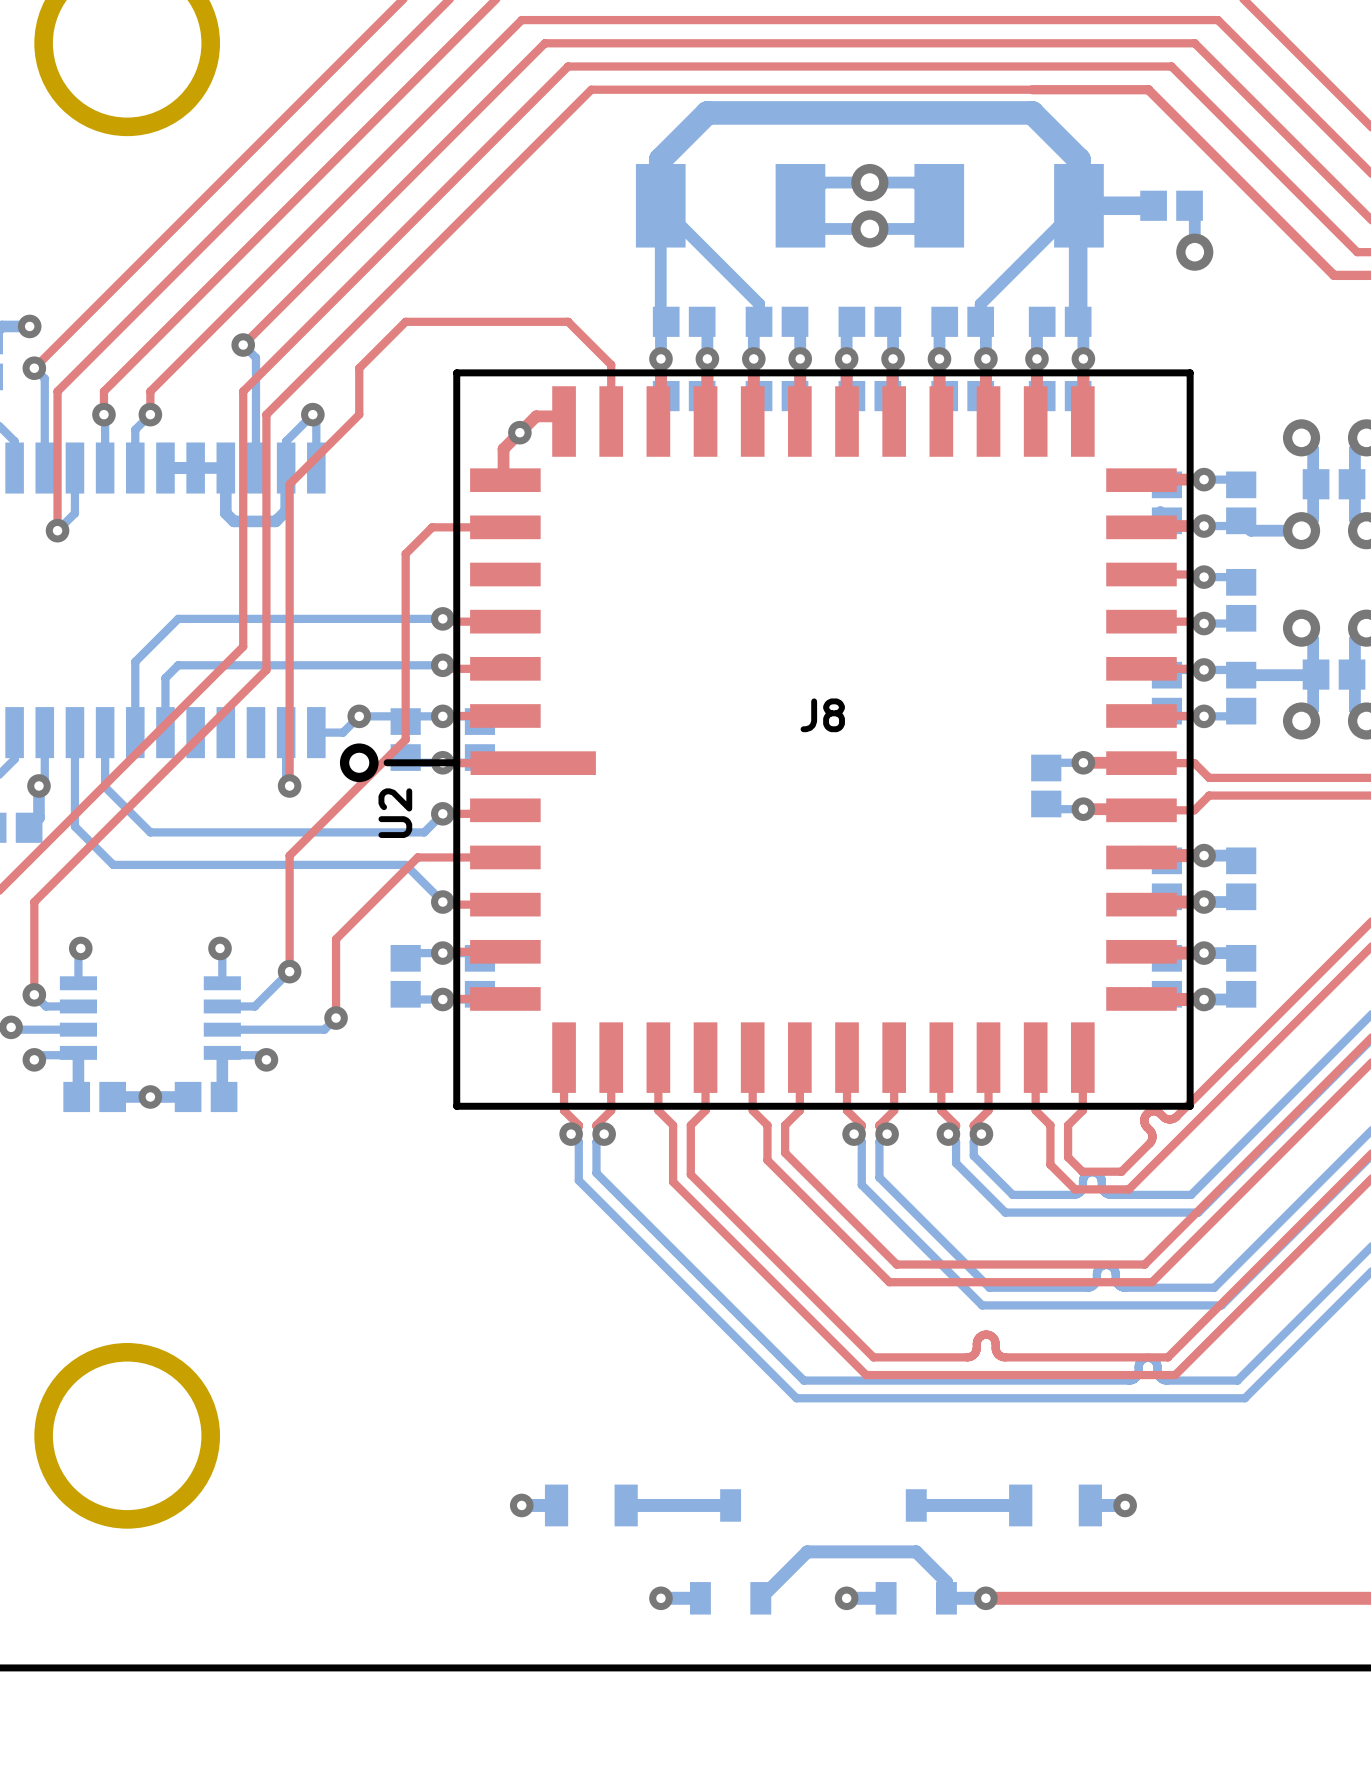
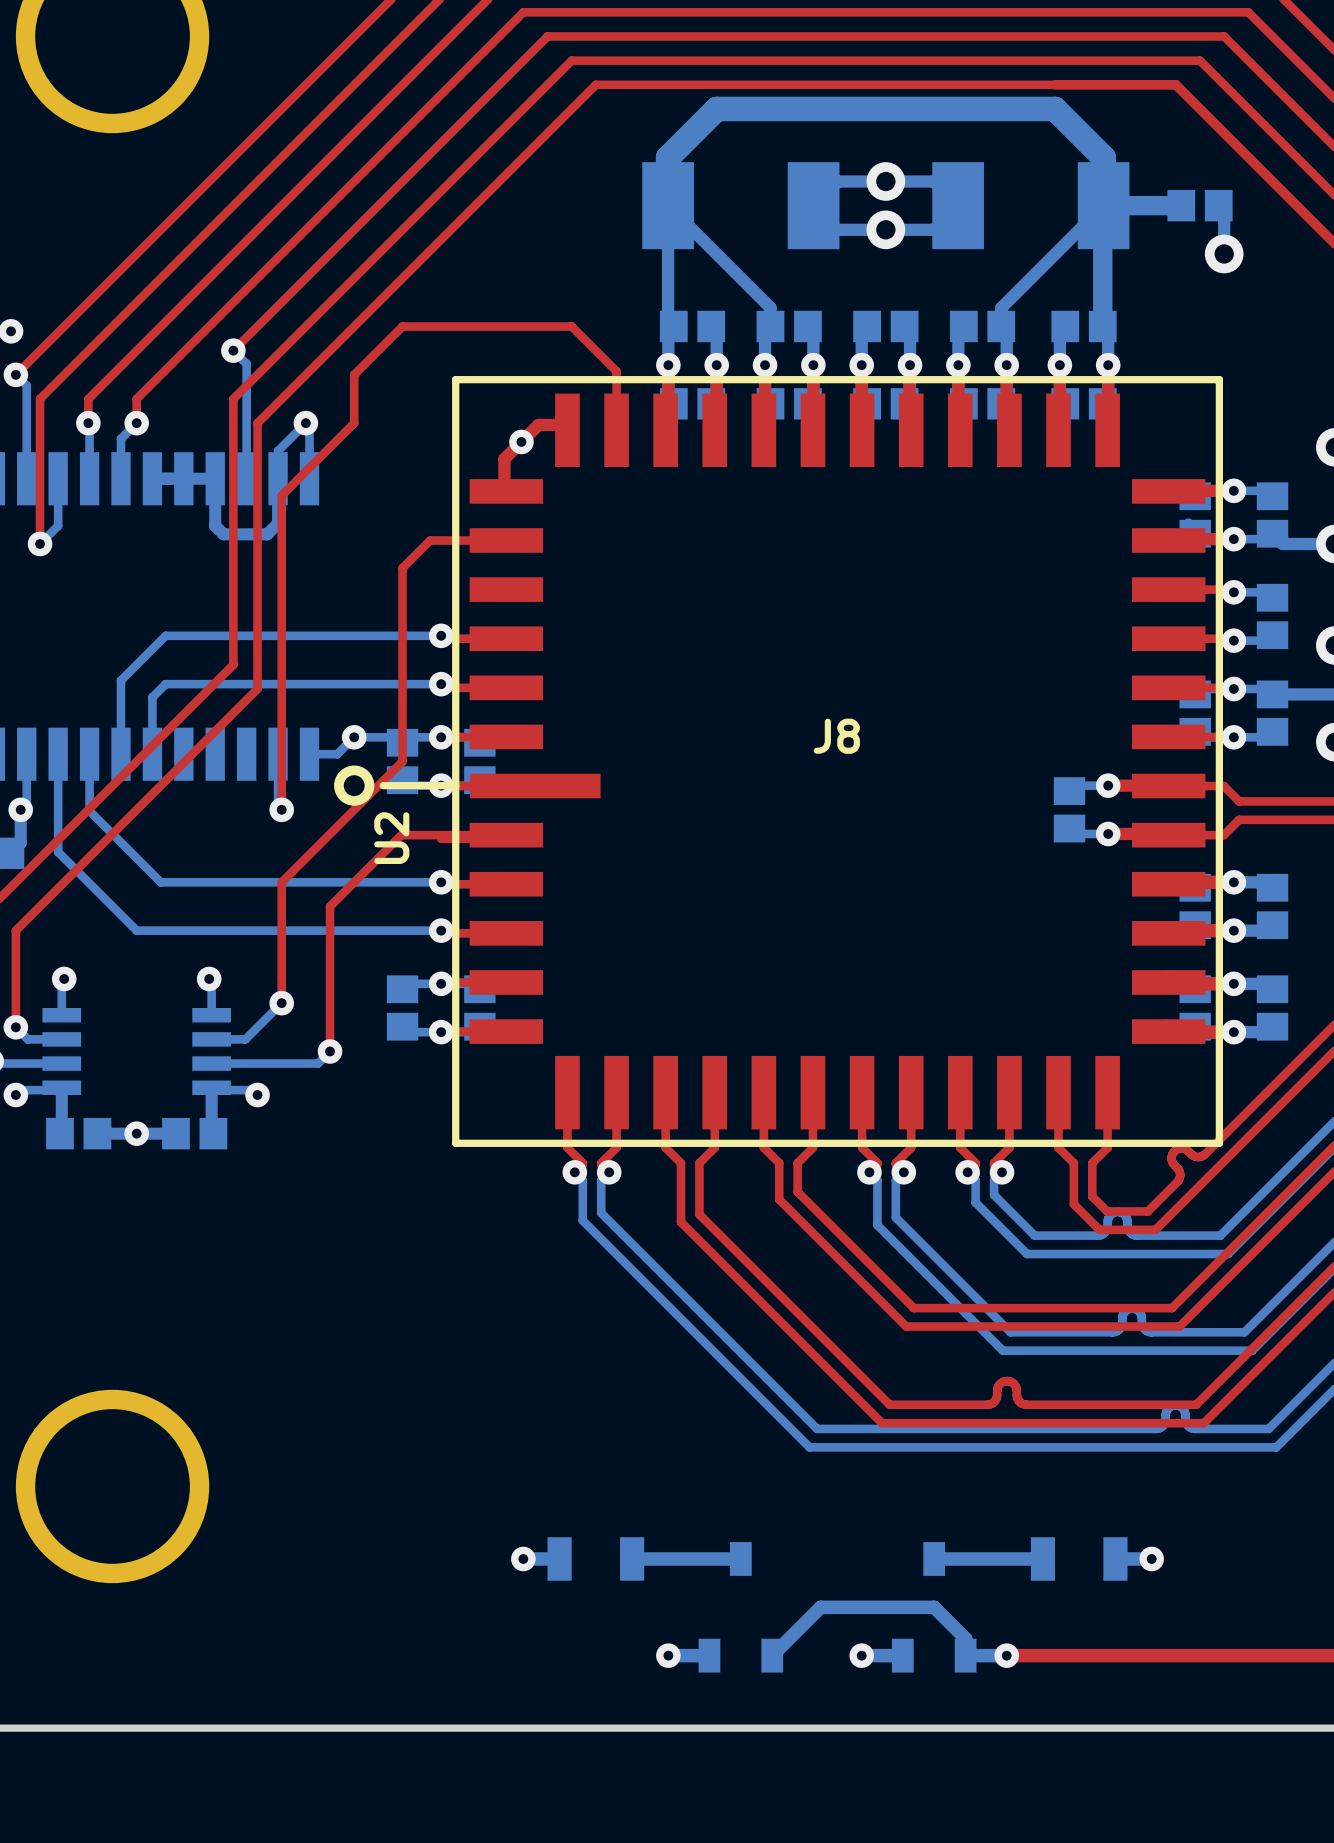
bottom track: (442, 813) (424, 832) (150, 832) -> (441, 882) (160, 882) (136, 858)
via position: (442, 813) -> (441, 882)
top track: (444, 857) (417, 857) (336, 939) -> (506, 835) (401, 835) (330, 906) (330, 969)
bottom track: (113, 864) (405, 864) (442, 902) -> (98, 891) (136, 930) (441, 930)

